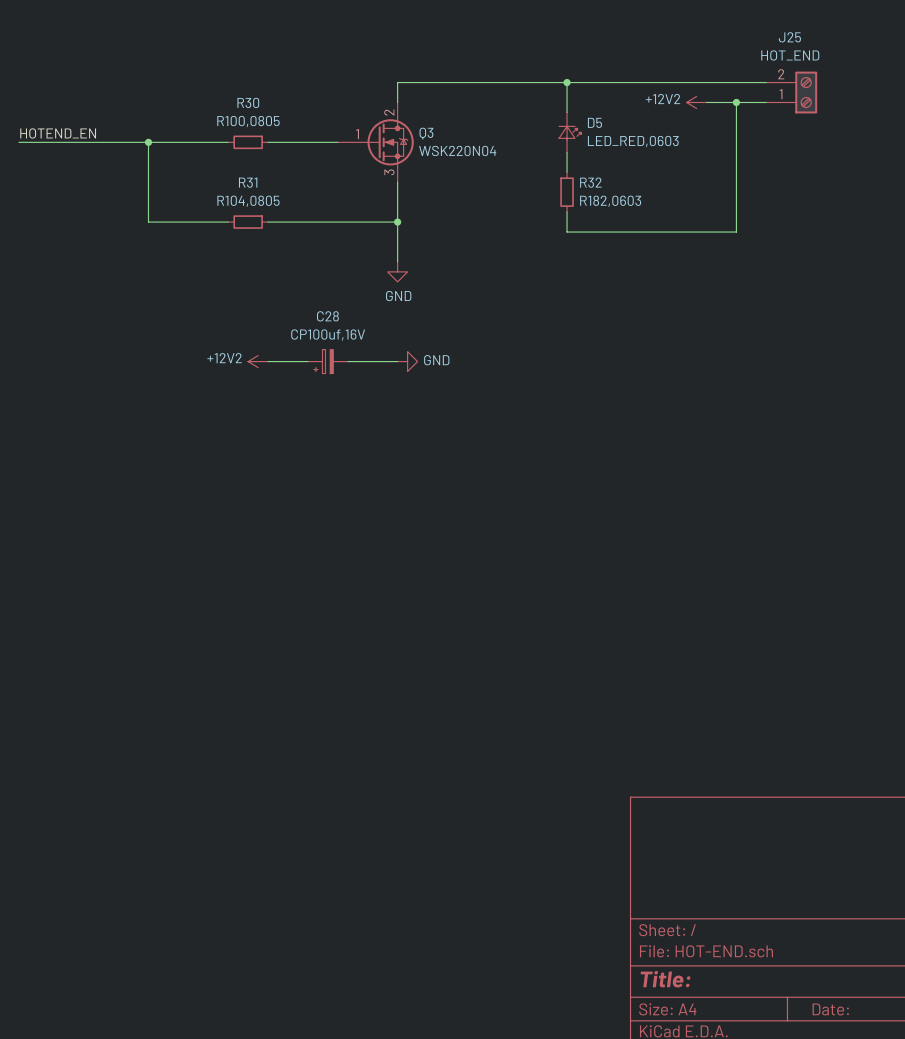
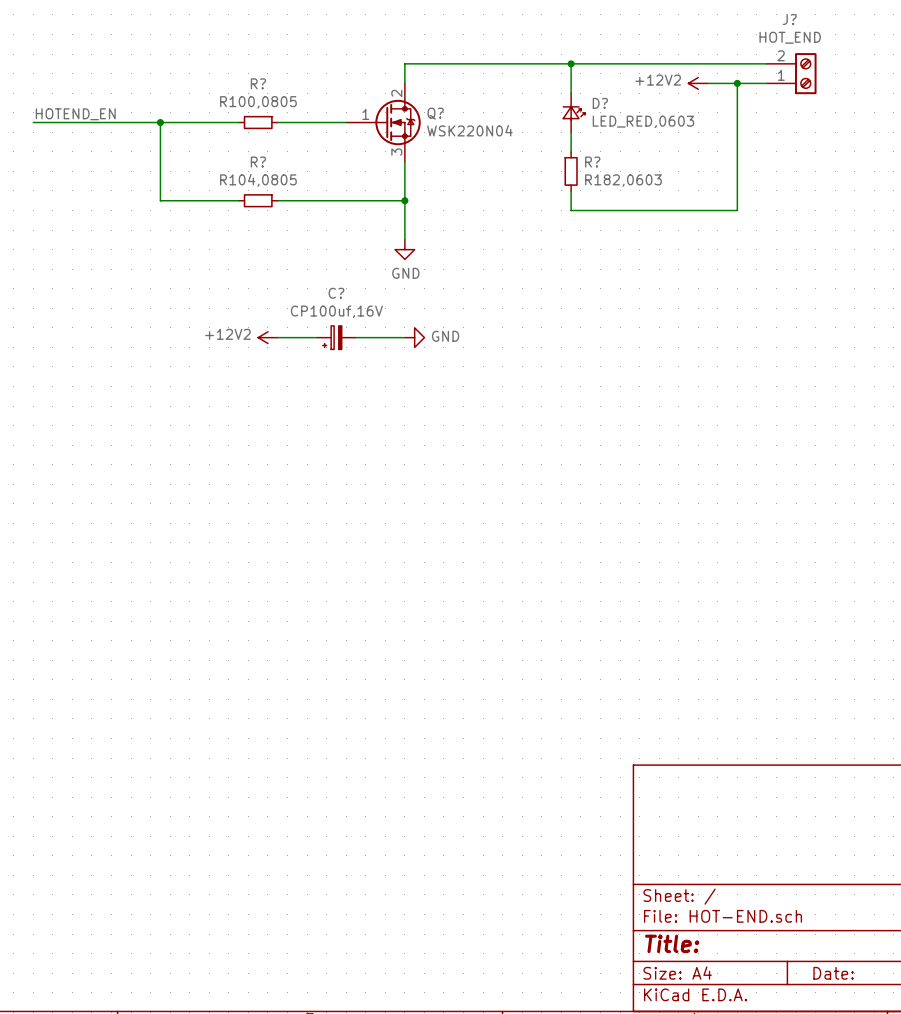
J25 name: J25 (789, 37) -> J? (789, 19)
R30 name: R30 (248, 102) -> R? (258, 83)
D5 name: D5 (594, 122) -> D? (600, 103)
Q3 name: Q3 (426, 133) -> Q? (435, 113)
R31 name: R31 (248, 182) -> R? (258, 162)
R32 name: R32 (590, 182) -> R? (592, 162)
C28 name: C28 (327, 316) -> C? (336, 293)

